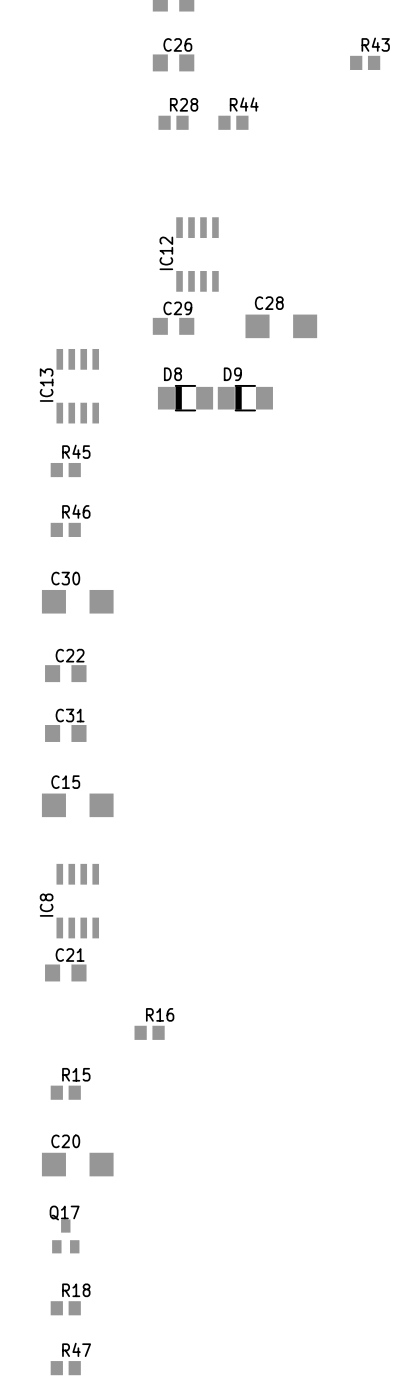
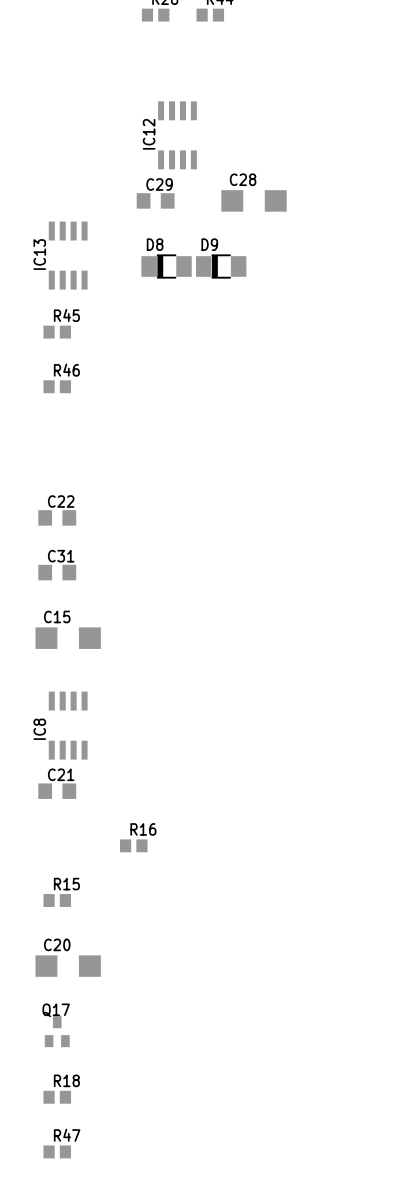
C30: (77, 601) -> none

